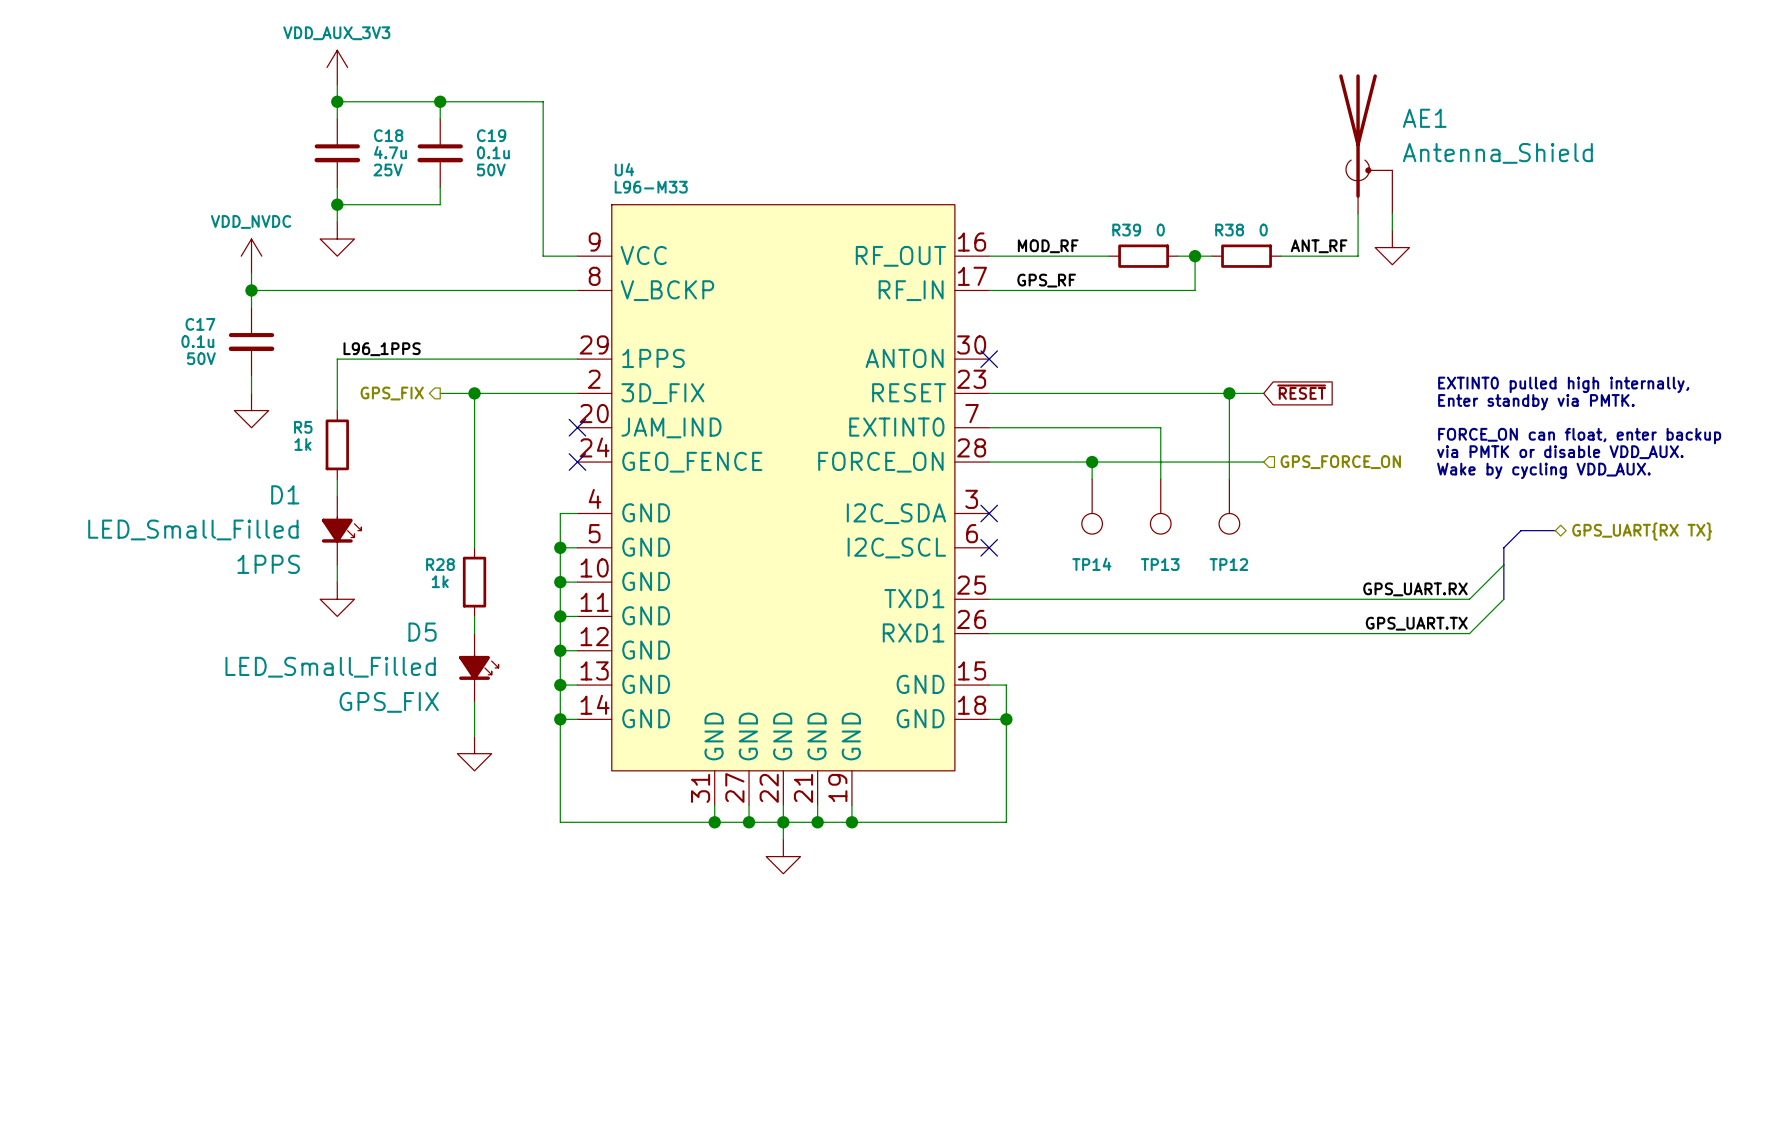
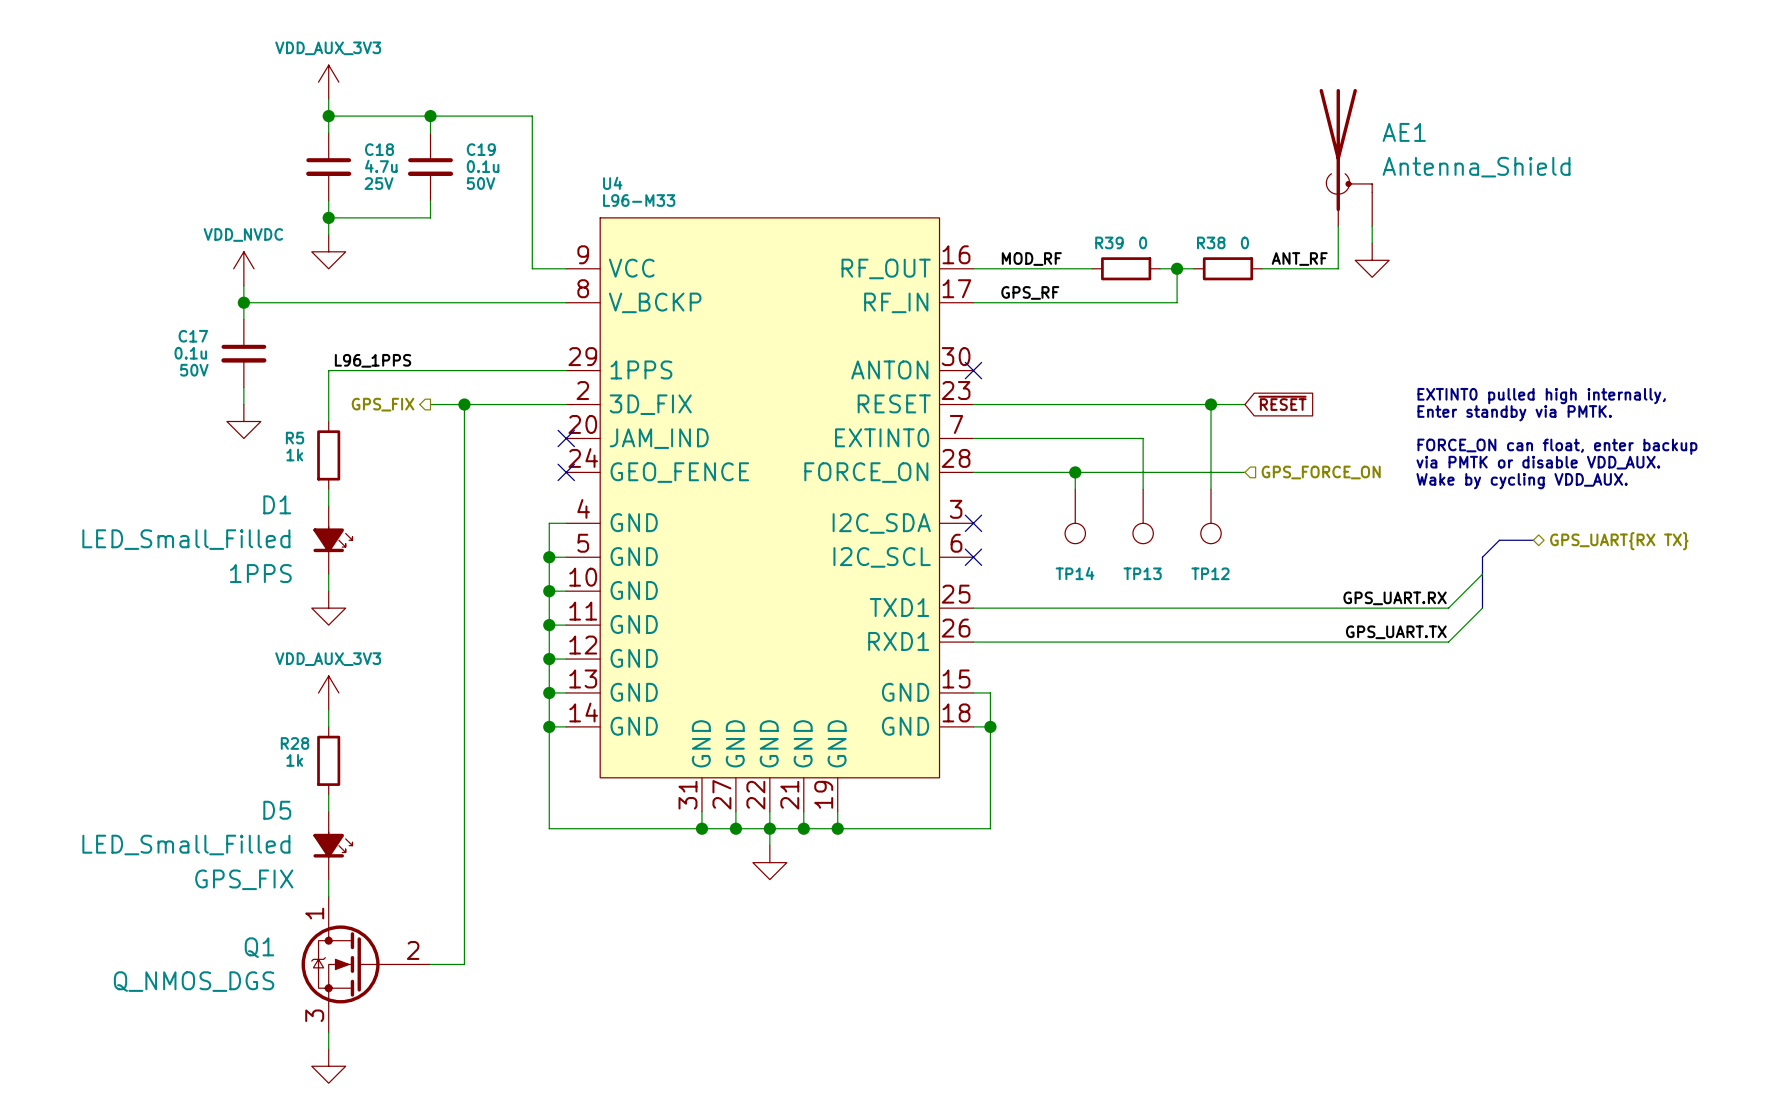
wire: none -> (464, 557) (464, 625)
R28 position: (474, 582) -> (328, 760)
D5 position: (478, 667) -> (332, 845)
power symbol: none -> VDD_AUX_3V3 (328, 692)
wire: none -> (328, 709) (328, 726)
wire: none -> (464, 743) (464, 964) (430, 964)
power symbol: (474, 753) -> none
wire: none -> (328, 794) (328, 811)
wire: none -> (328, 879) (328, 896)
Q1: none -> Q_NMOS_DGS (366, 964)
wire: none -> (328, 1032) (328, 1049)
power symbol: none -> (328, 1066)

